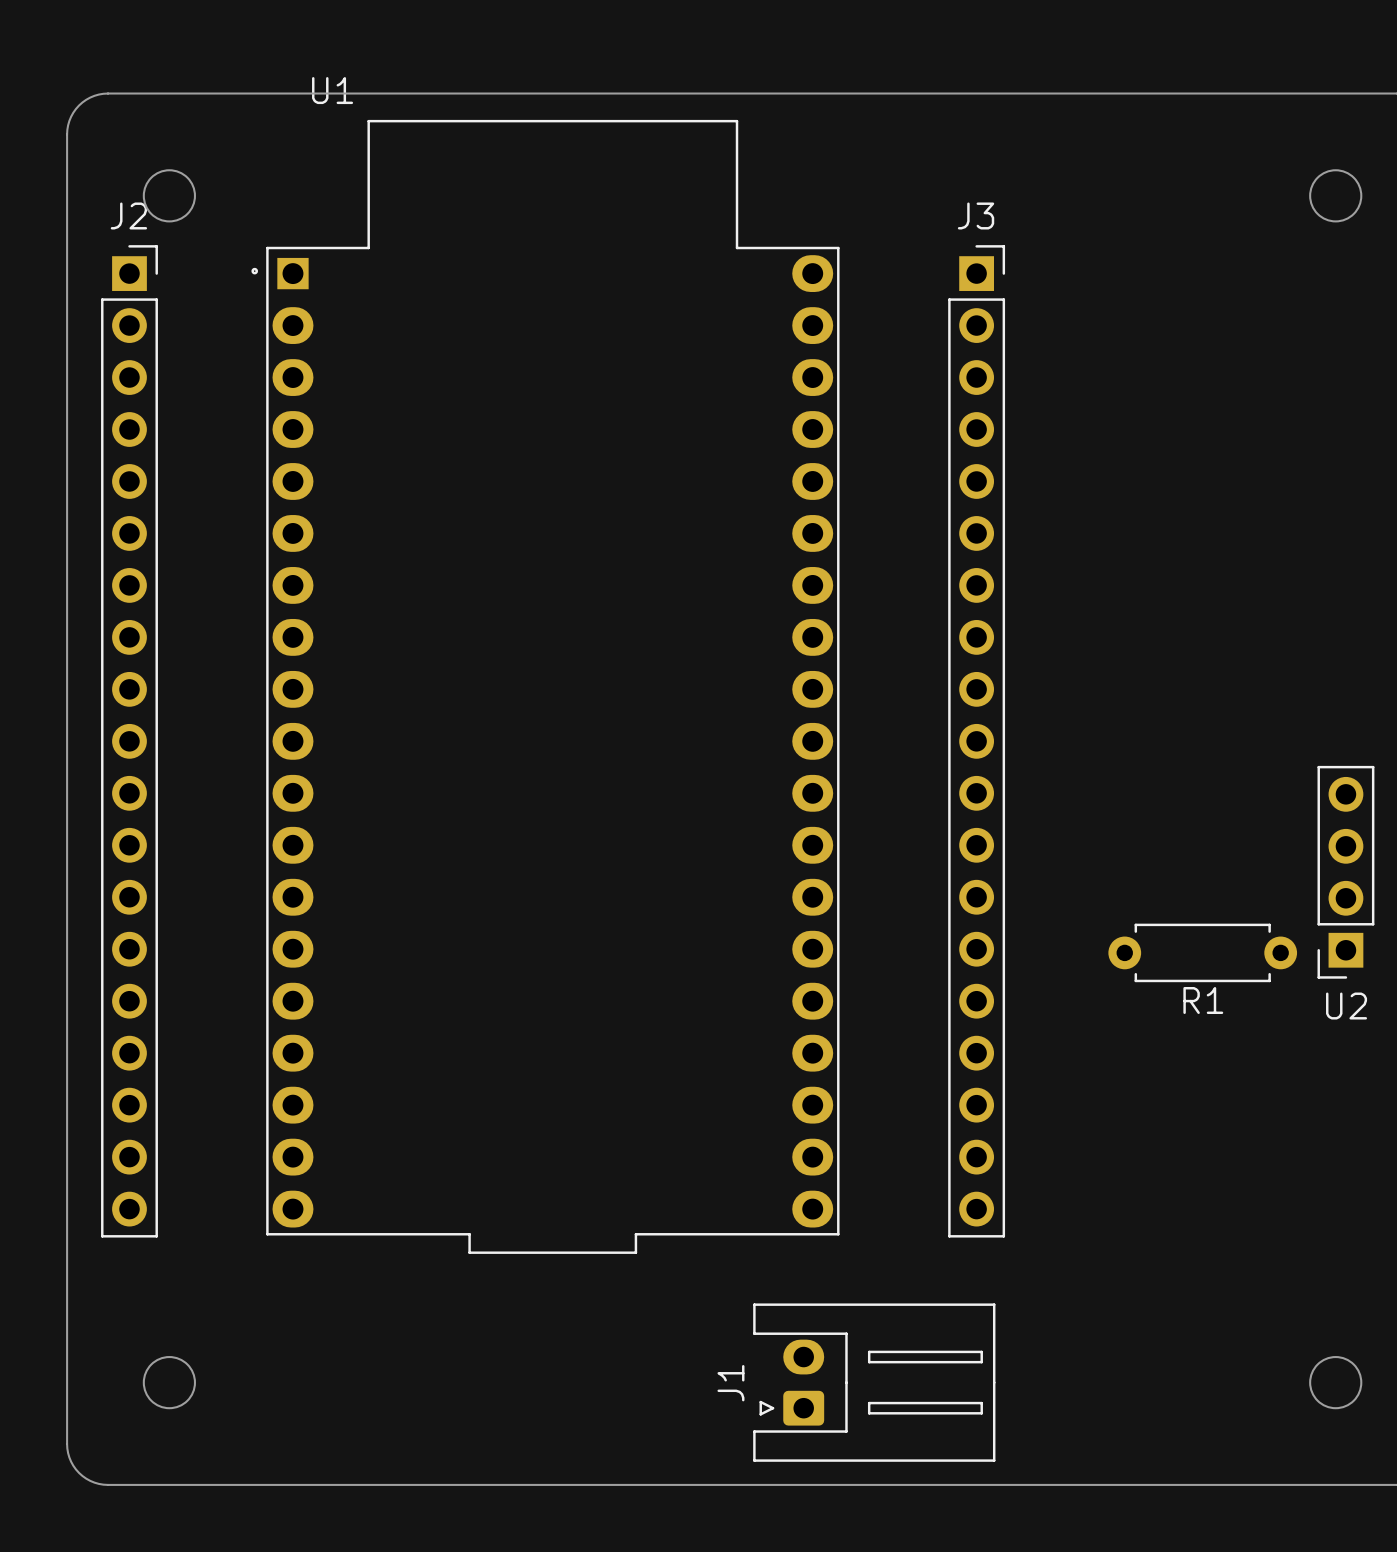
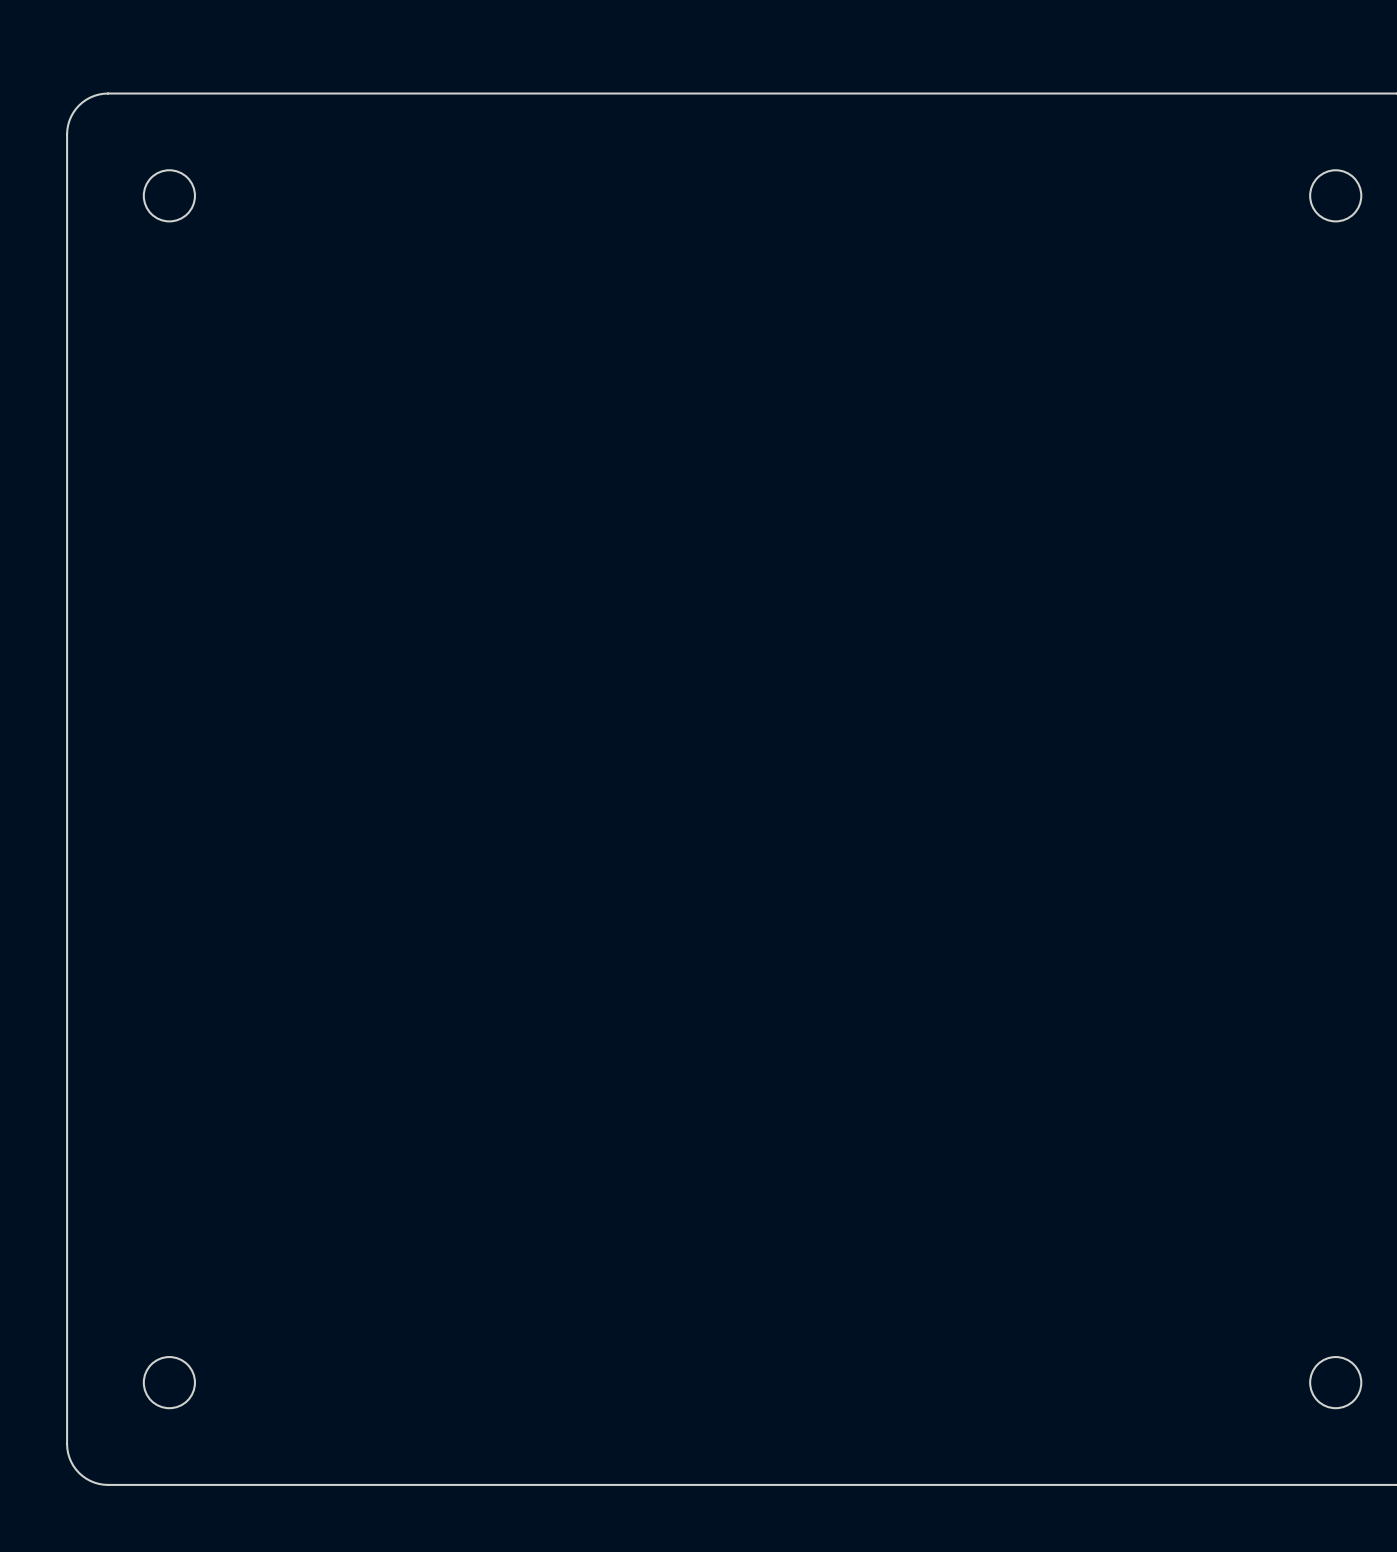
U1: (545, 686) -> none
J2: (129, 741) -> none
J3: (976, 741) -> none
U2: (1345, 872) -> none
R1: (1202, 952) -> none
J1: (874, 1382) -> none

